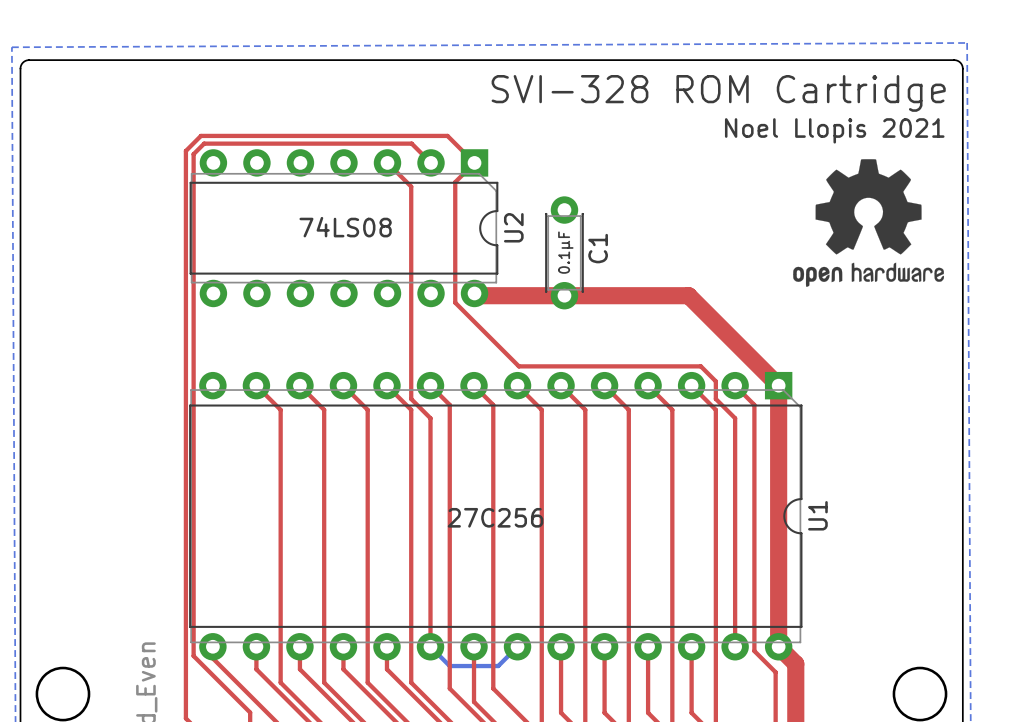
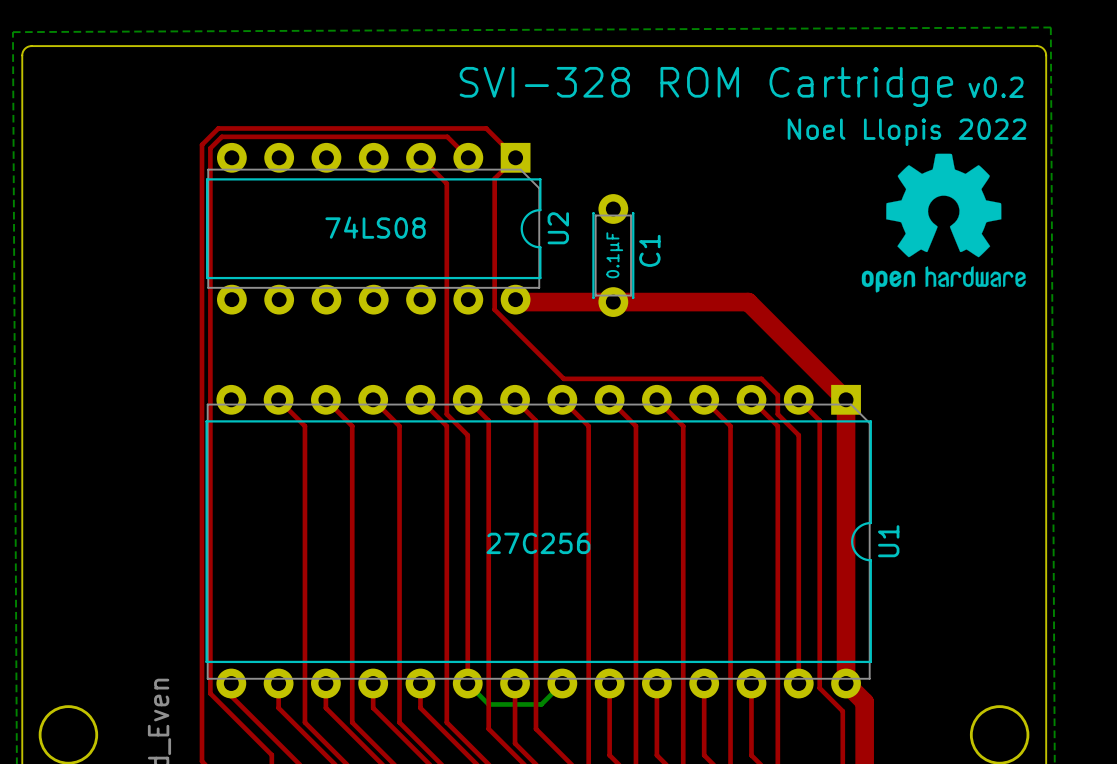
text position: SVI-328 ROM Cartridge (718, 93) -> SVI-328 ROM Cartridge (706, 86)
text: none -> v0.2 (996, 87)
text: Noel Llopis 2021 (834, 130) -> Noel Llopis 2022 (906, 132)

